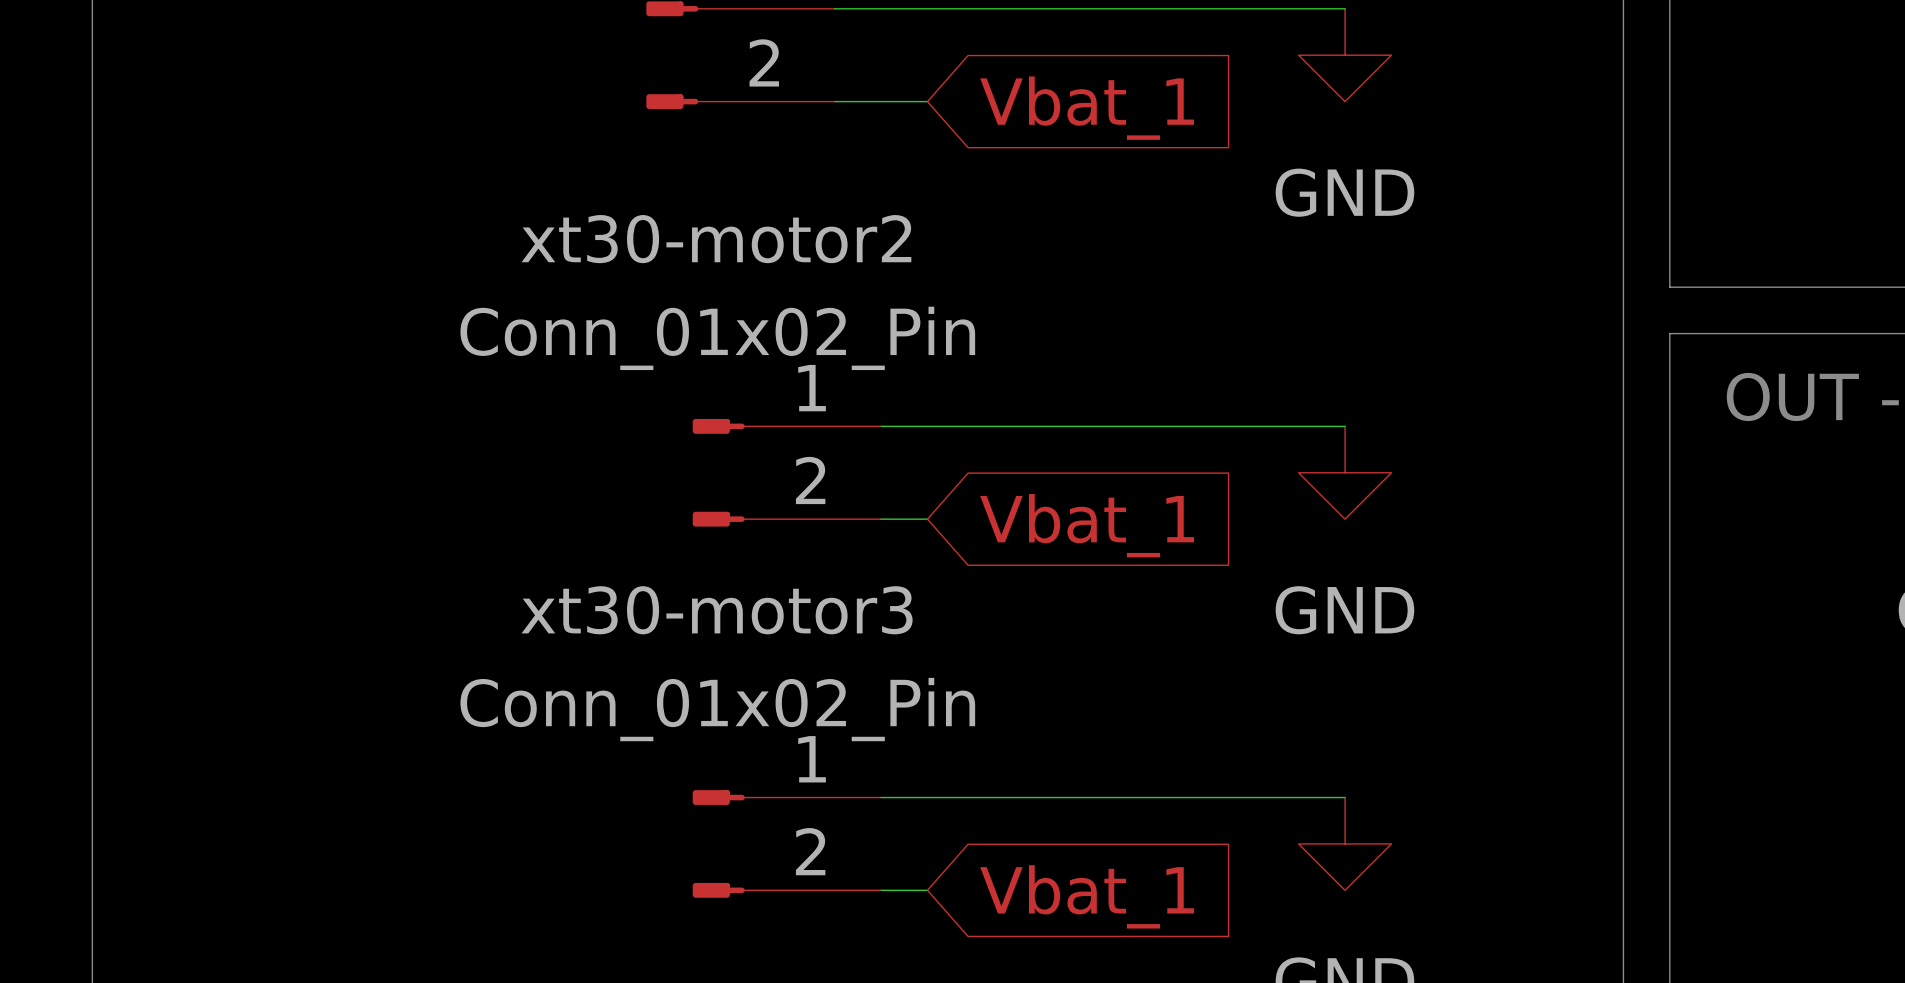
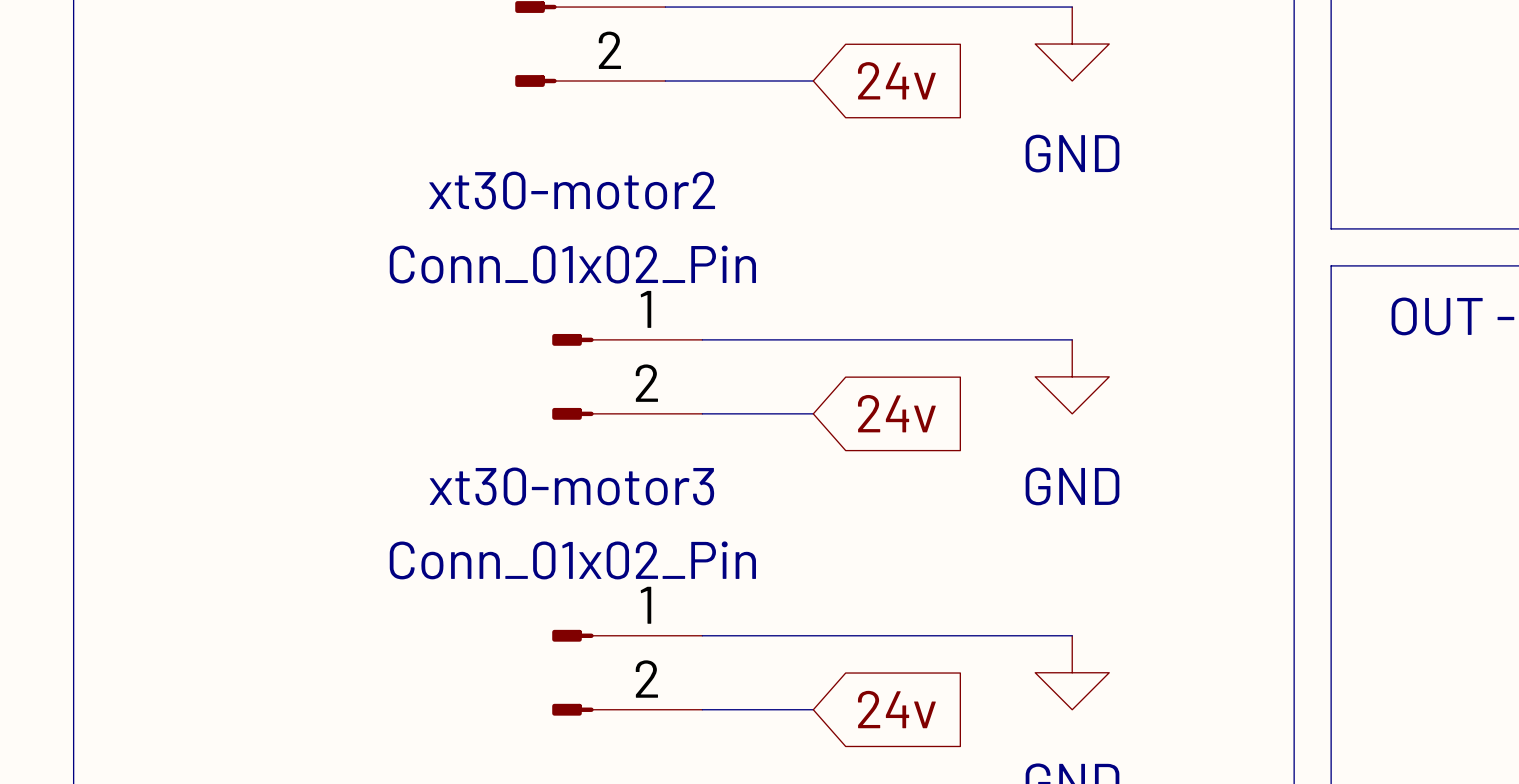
wire: none -> (739, 80) (813, 80)
global label: none -> 24v (896, 80)
global label: Vbat_1 (1087, 108) -> none
global label: none -> 24v (896, 413)
wire: none -> (739, 413) (813, 413)
global label: Vbat_1 (1087, 525) -> none
global label: none -> 24v (896, 709)
wire: none -> (739, 709) (813, 709)
global label: Vbat_1 (1087, 896) -> none

